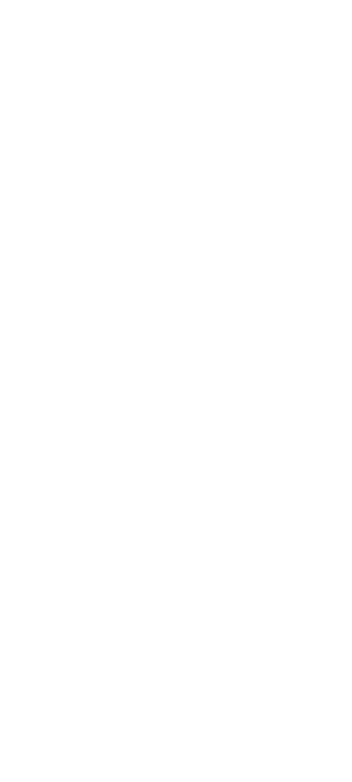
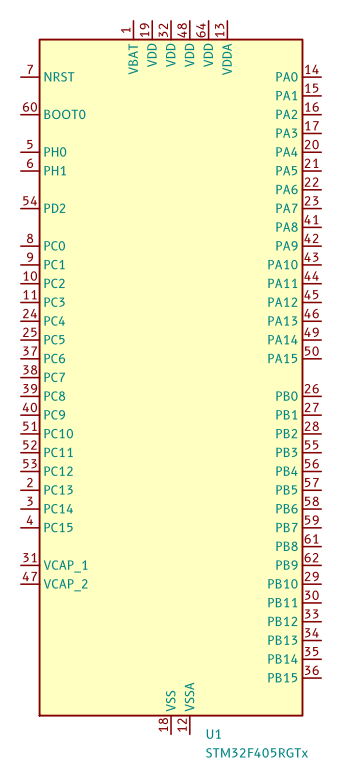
U1: none -> STM32F405RGTx (171, 377)

